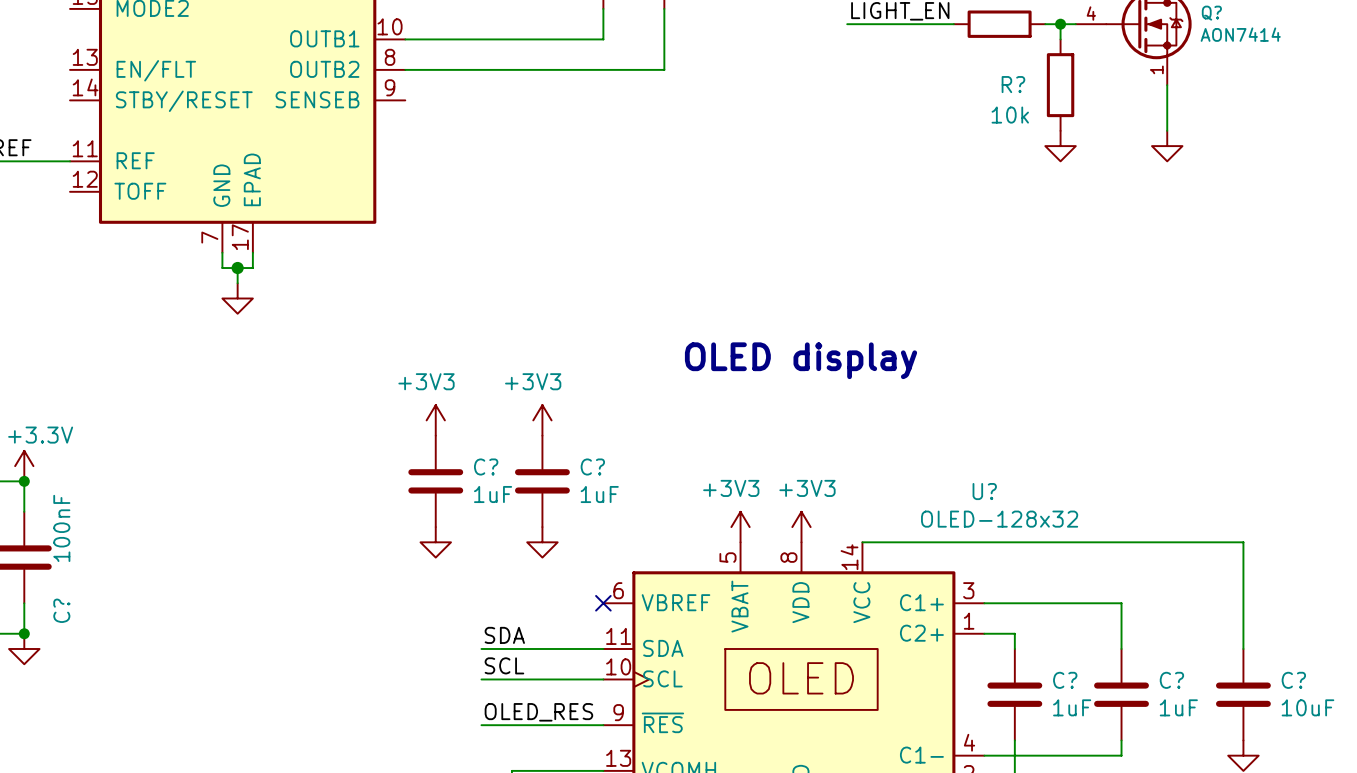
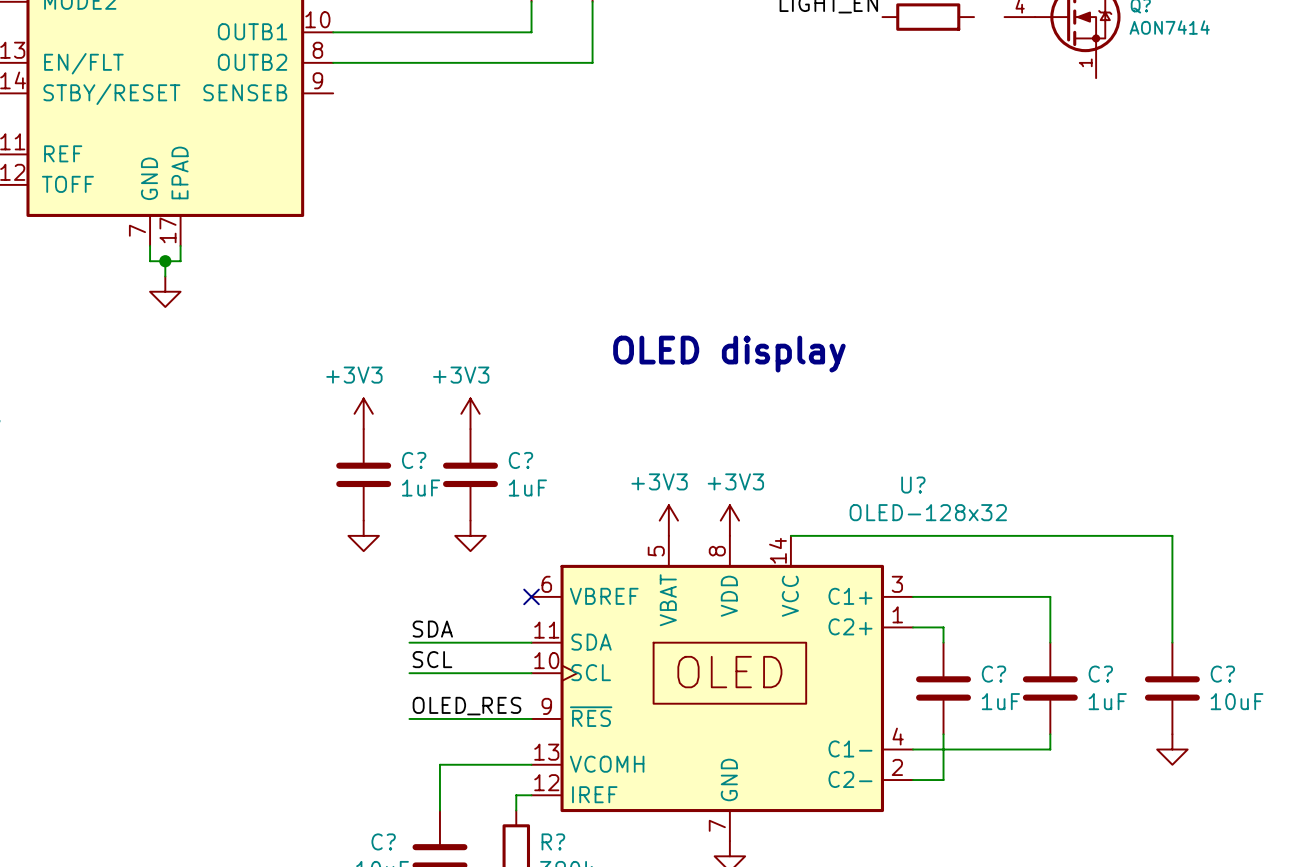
wire: (847, 24) (953, 24) -> none
wire: (1045, 24) (1075, 24) -> none
wire: (1060, 24) (1060, 39) -> none
junction: (1060, 24) -> none
R?: 10k (1060, 85) -> none
wire: (1167, 85) (1167, 130) -> none
power symbol: (1060, 146) -> none
power symbol: (1167, 146) -> none

